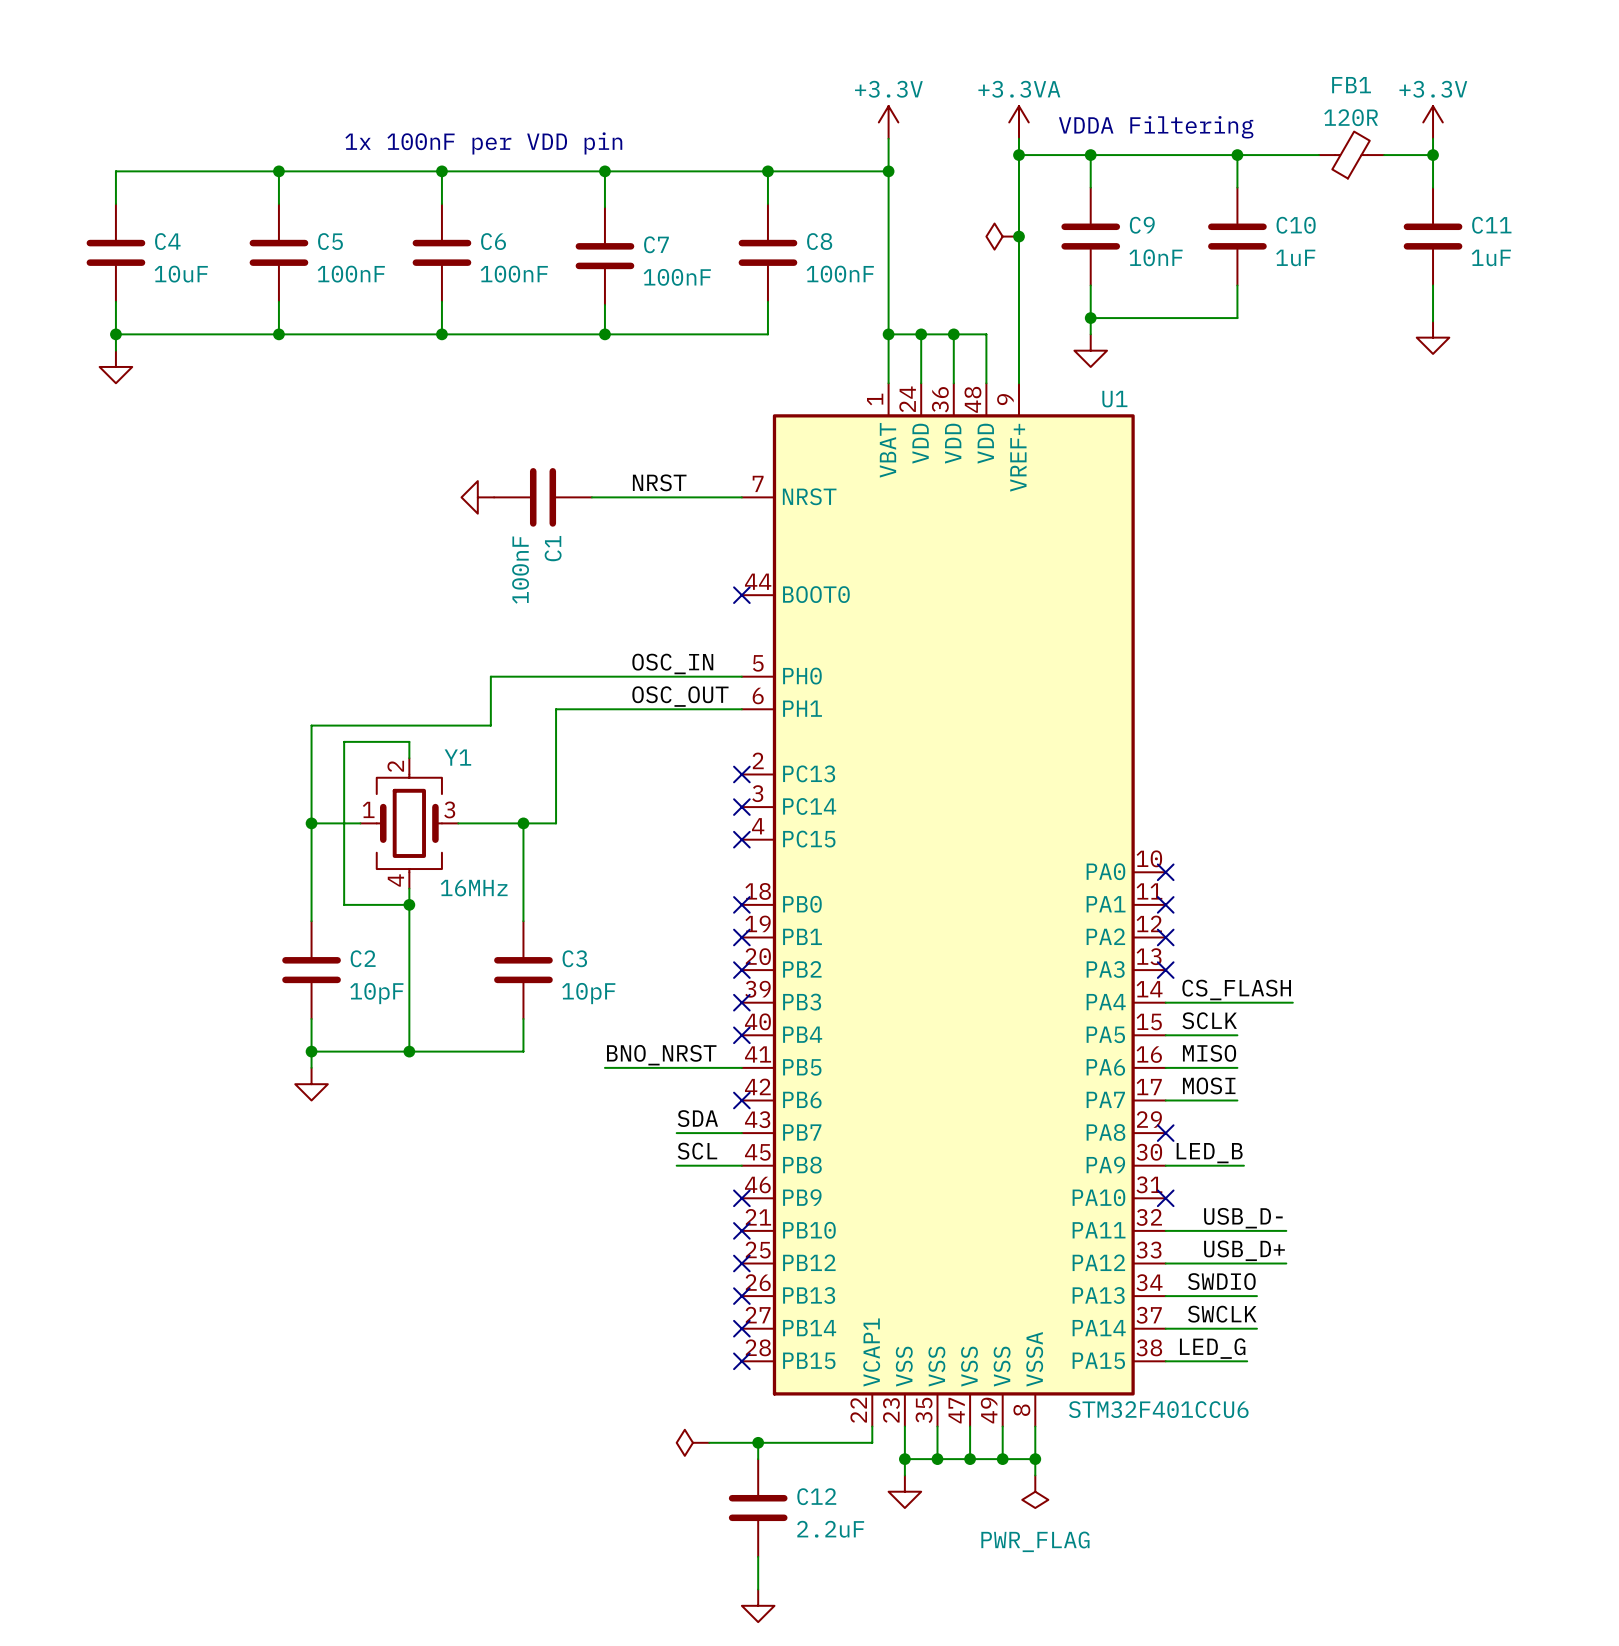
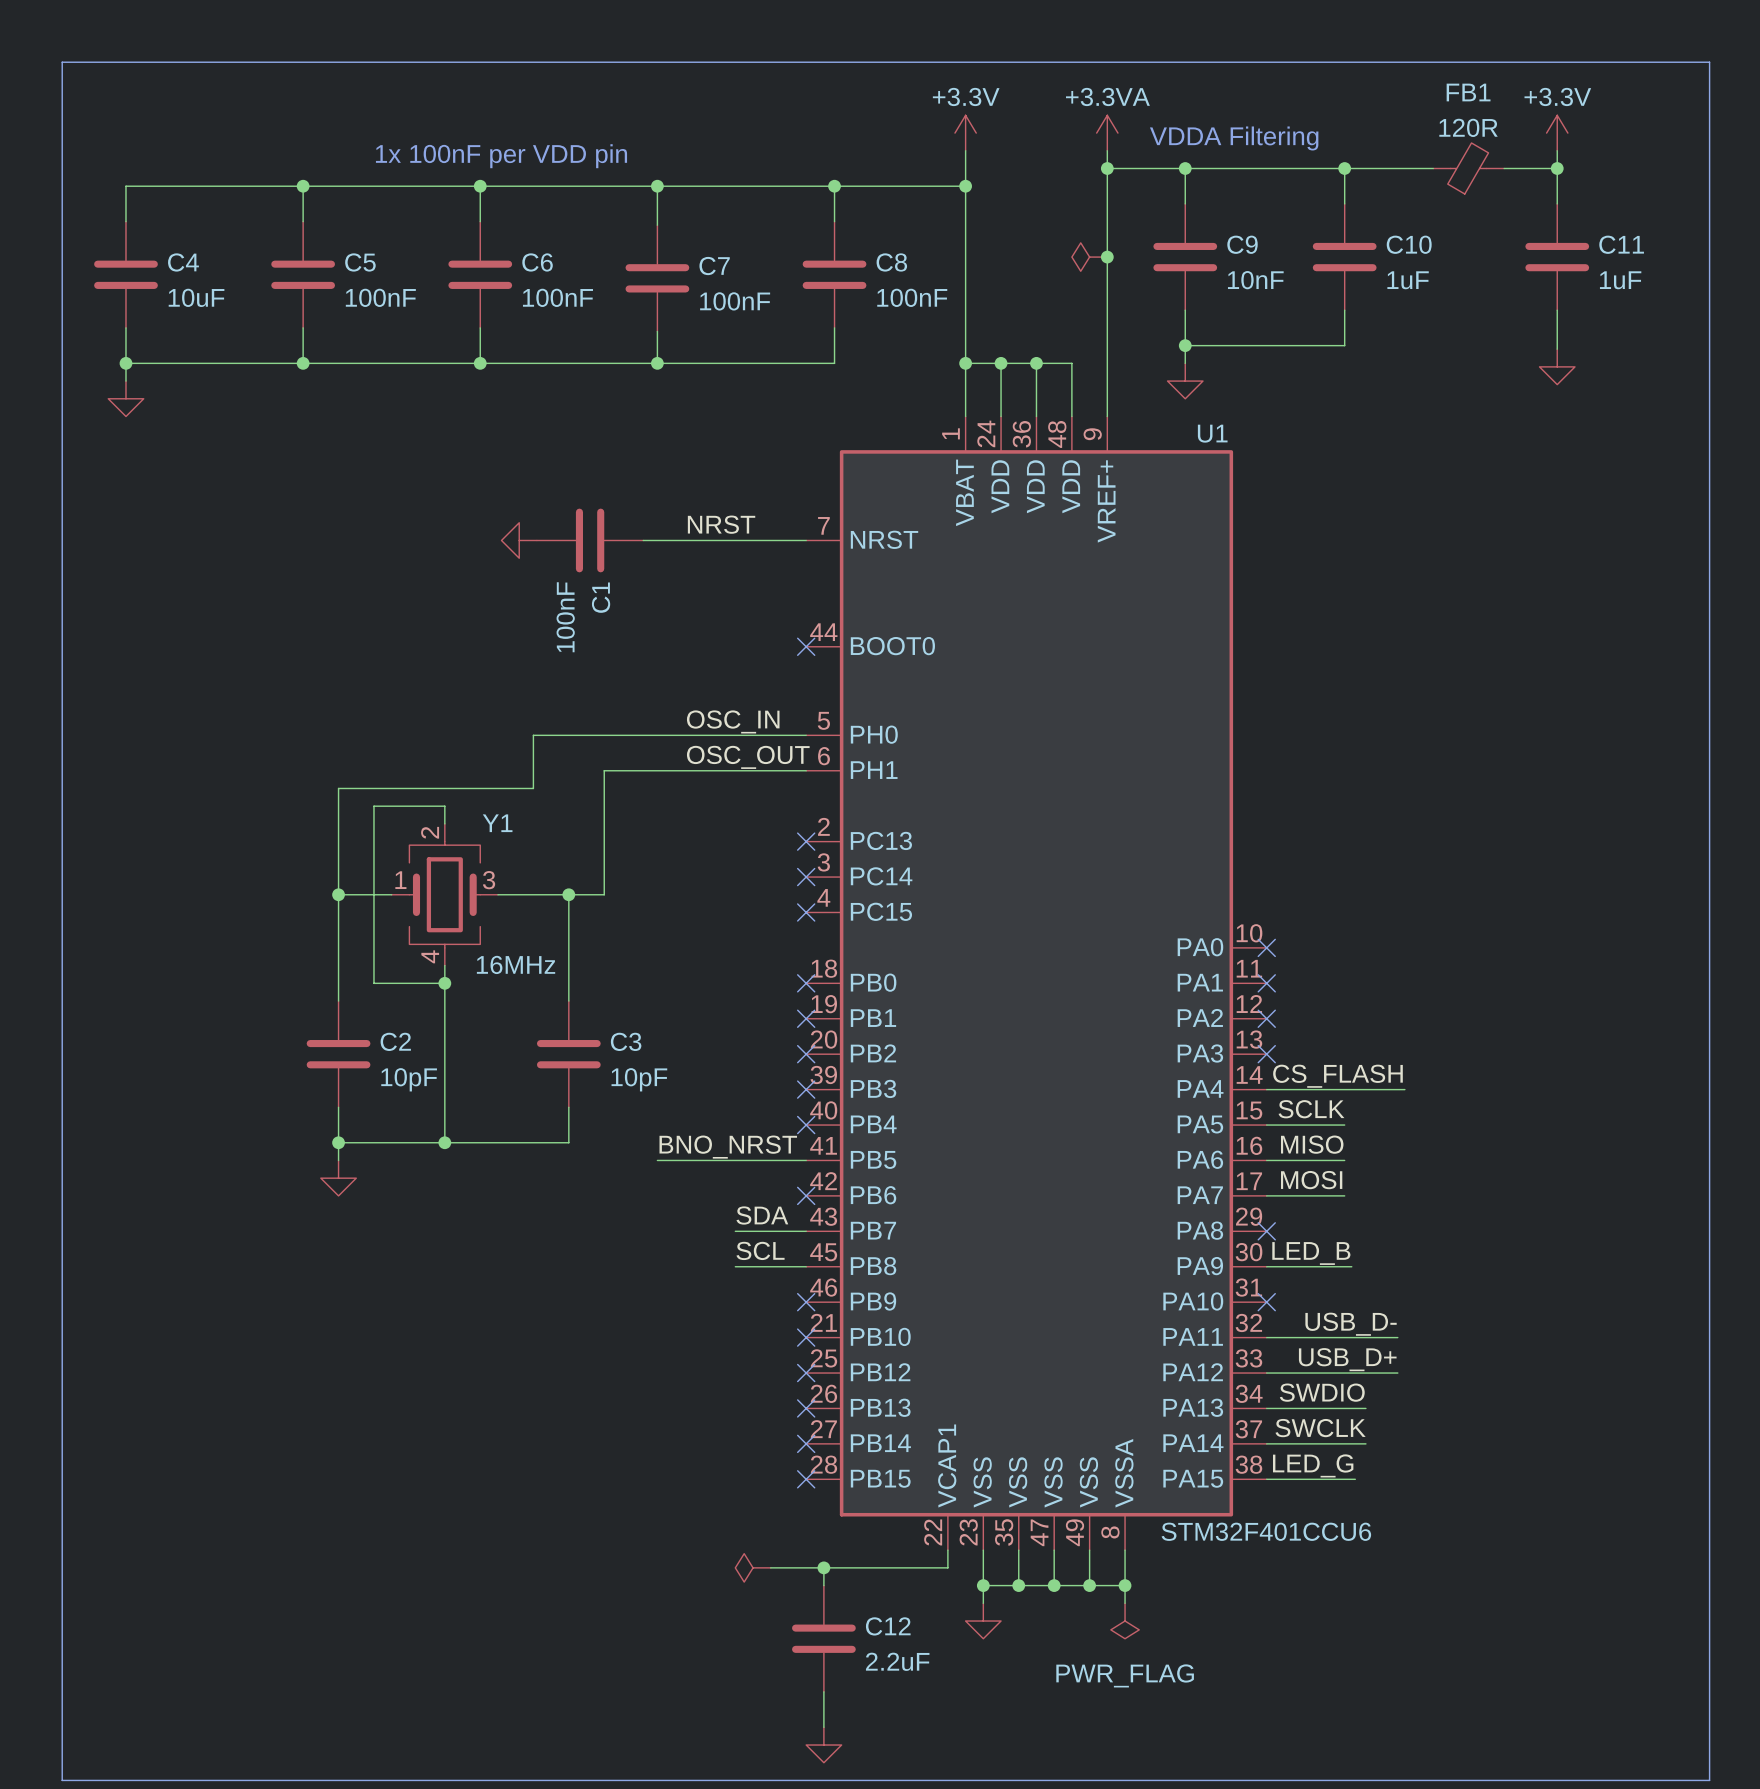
line: none -> (62, 62) (1709, 62) (1709, 1780) (62, 1780) (62, 62)

